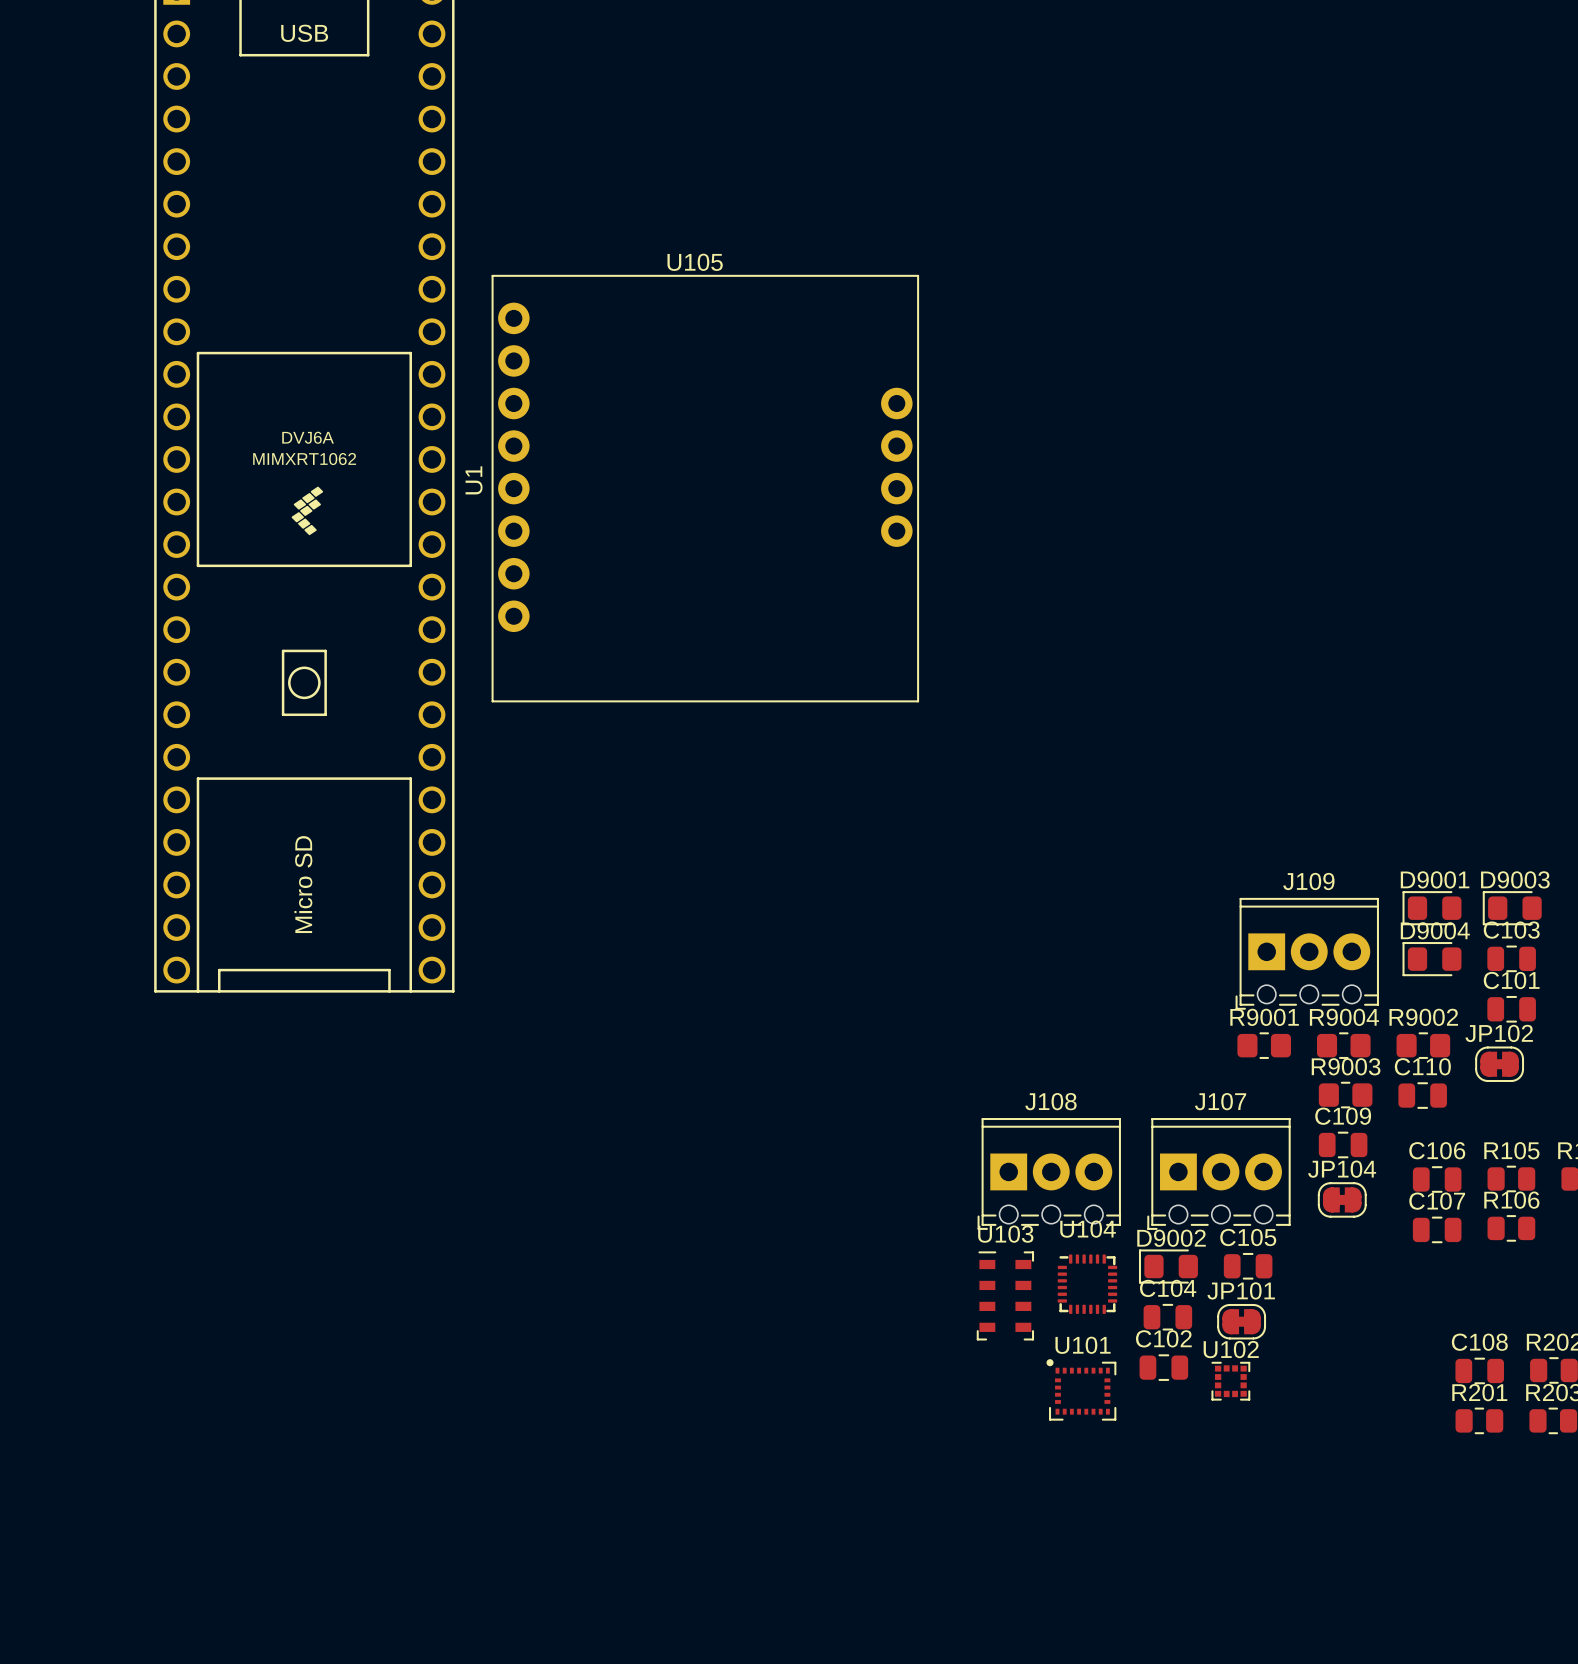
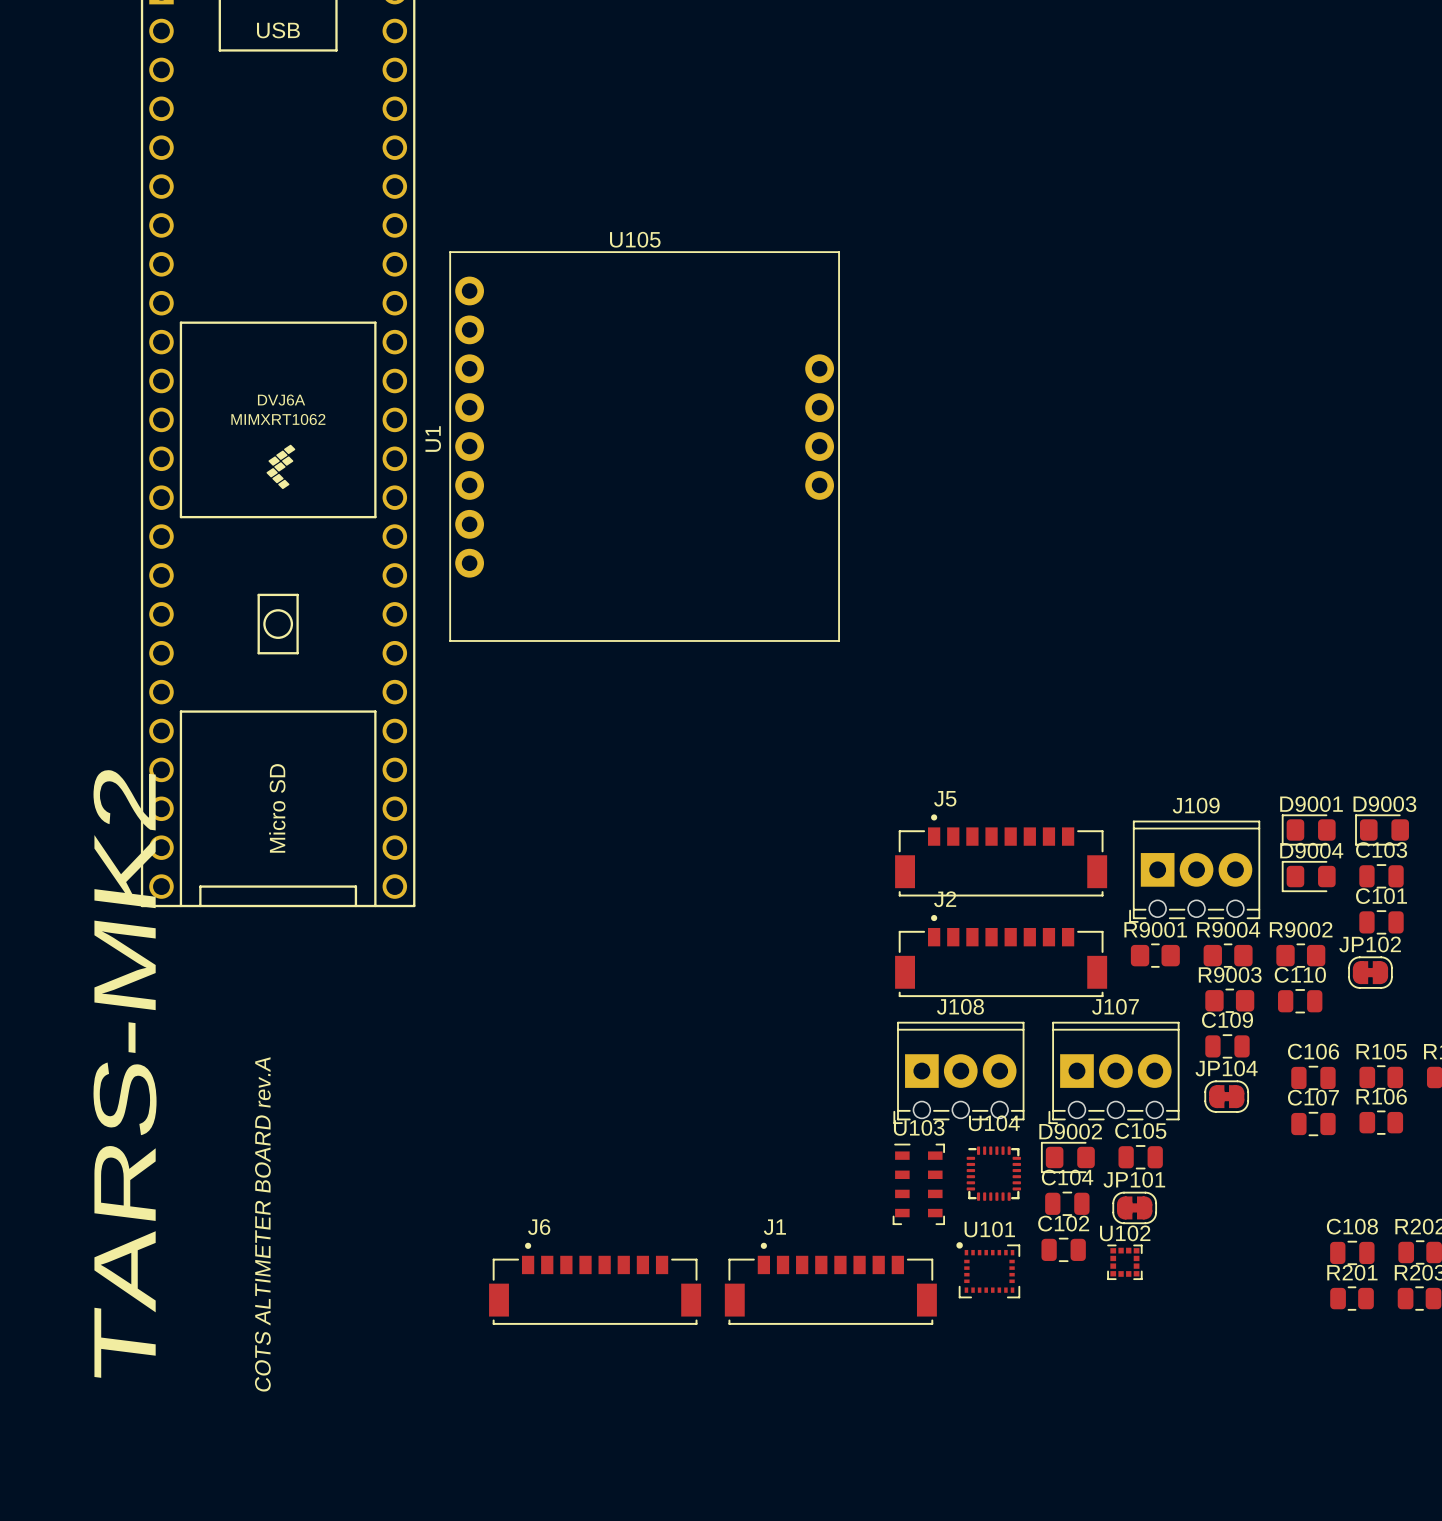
J5: none -> (1001, 855)
J2: none -> (1001, 956)
text: none -> TARS-MK2 (125, 1073)
text: none -> COTS ALTIMETER BOARD rev.A (262, 1224)
J6: none -> (595, 1283)
J1: none -> (830, 1283)

